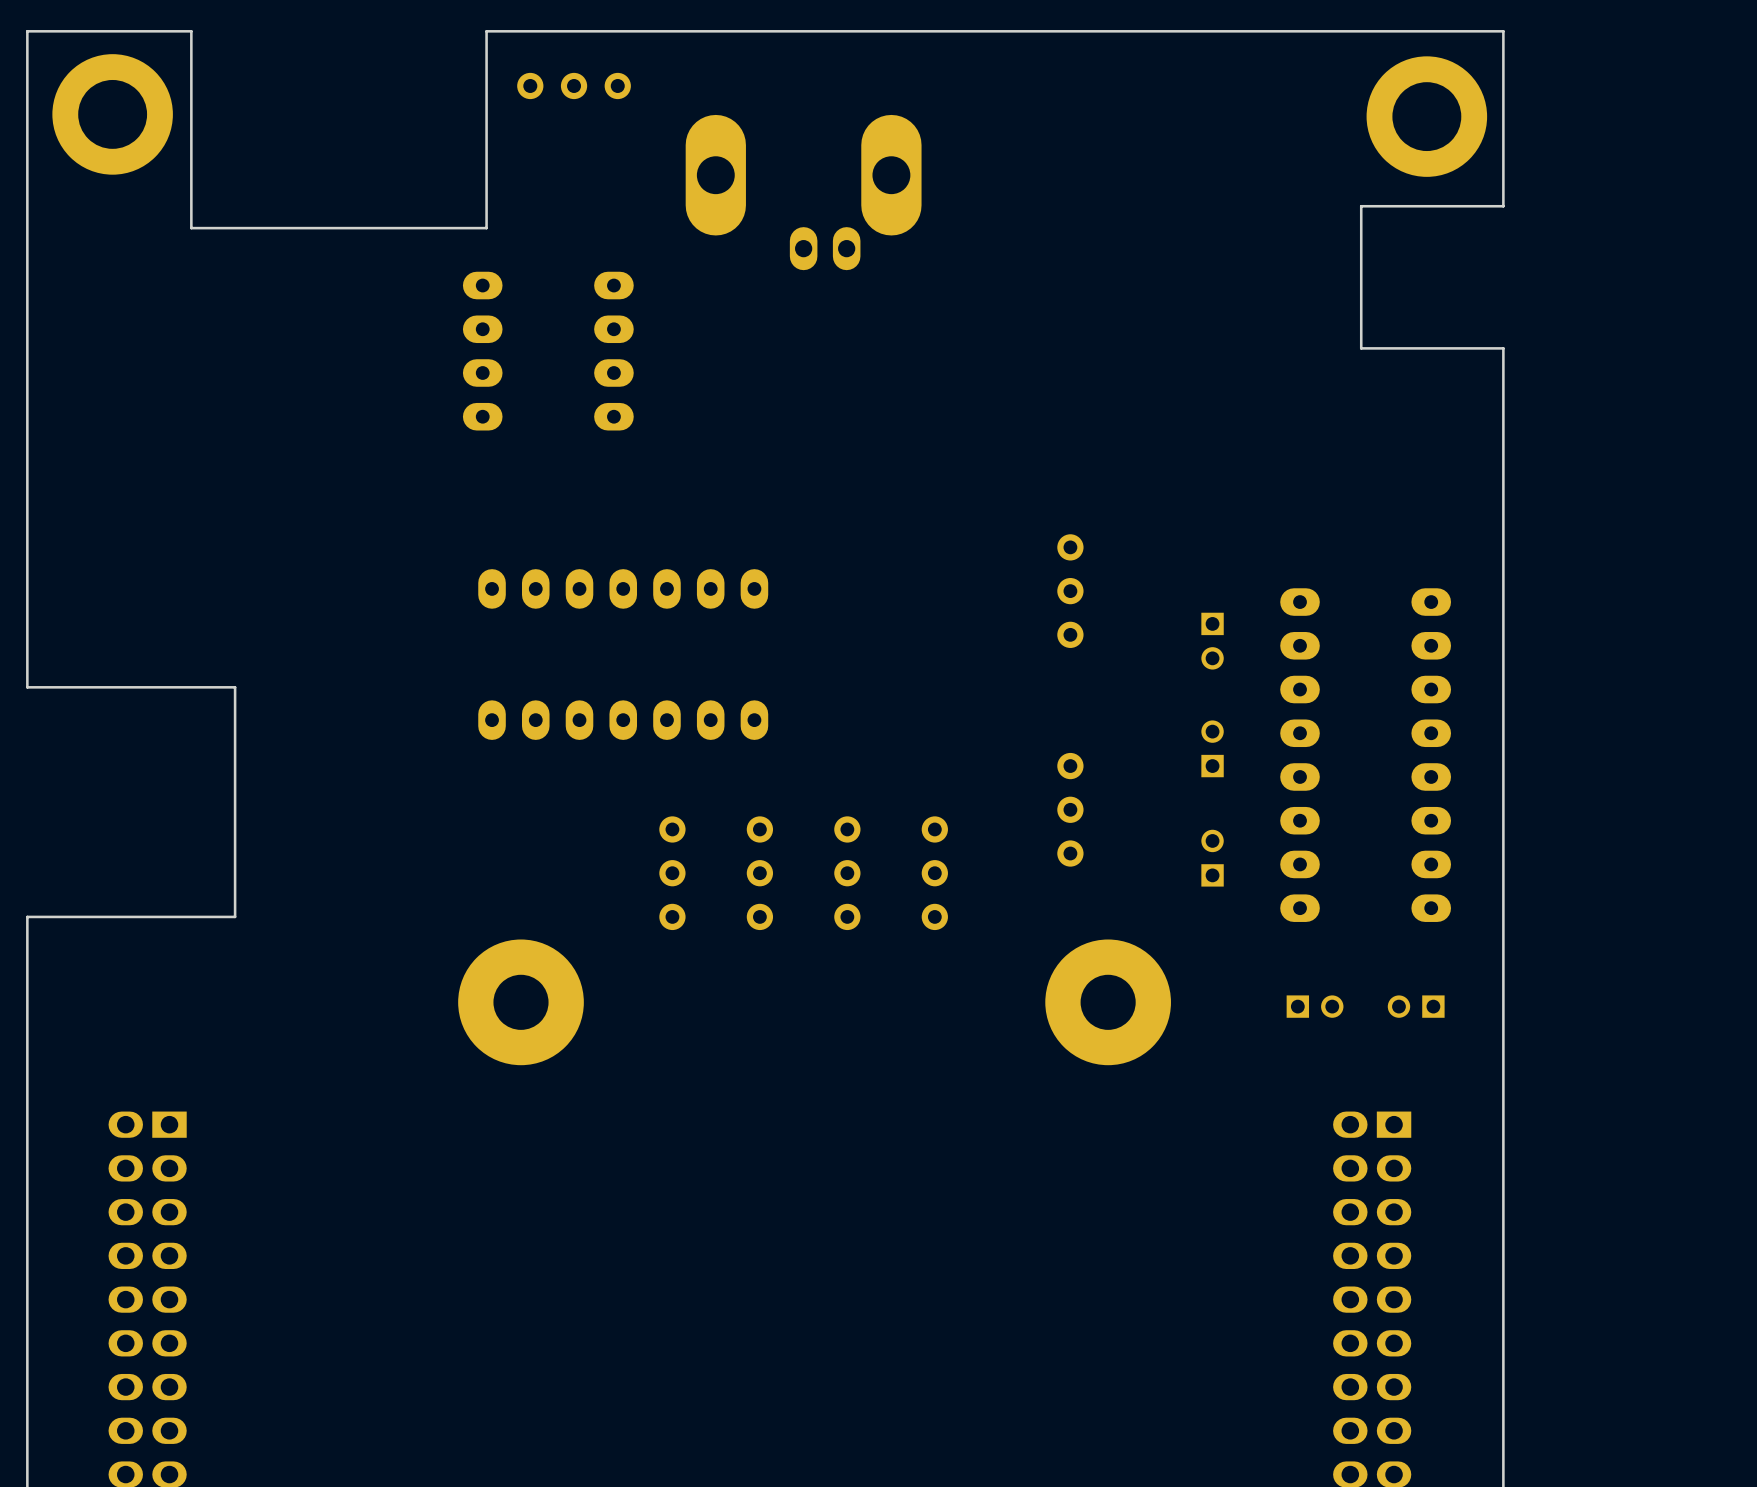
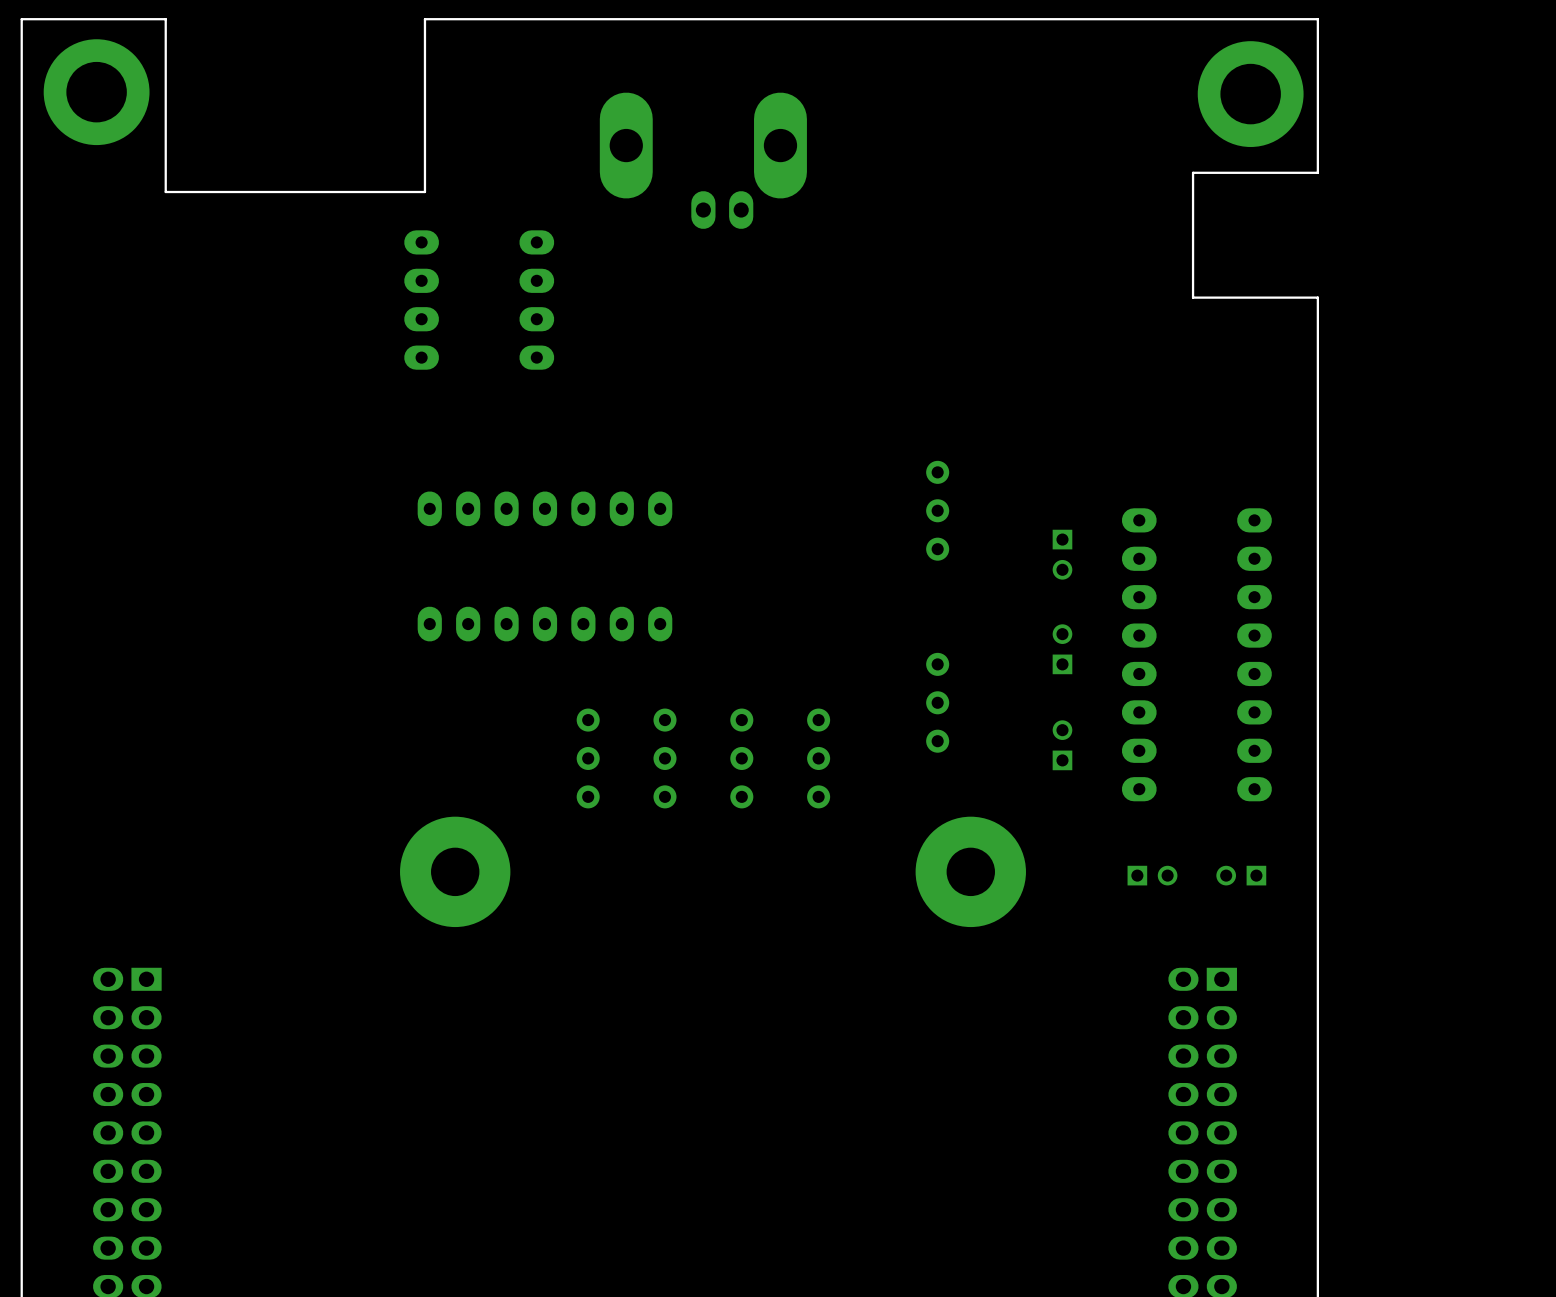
part: (574, 85) -> none
board edge: (27, 687) (235, 687) (235, 916) (27, 916) -> (21, 595) (21, 796)

